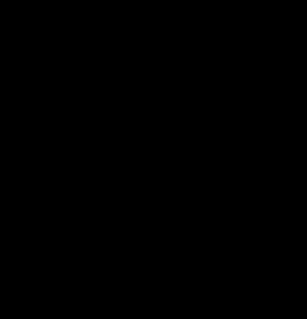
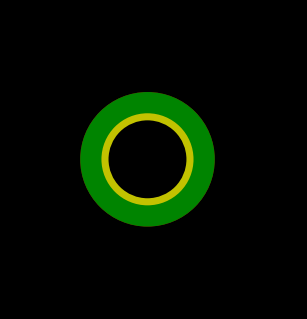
part: none -> (147, 159)

